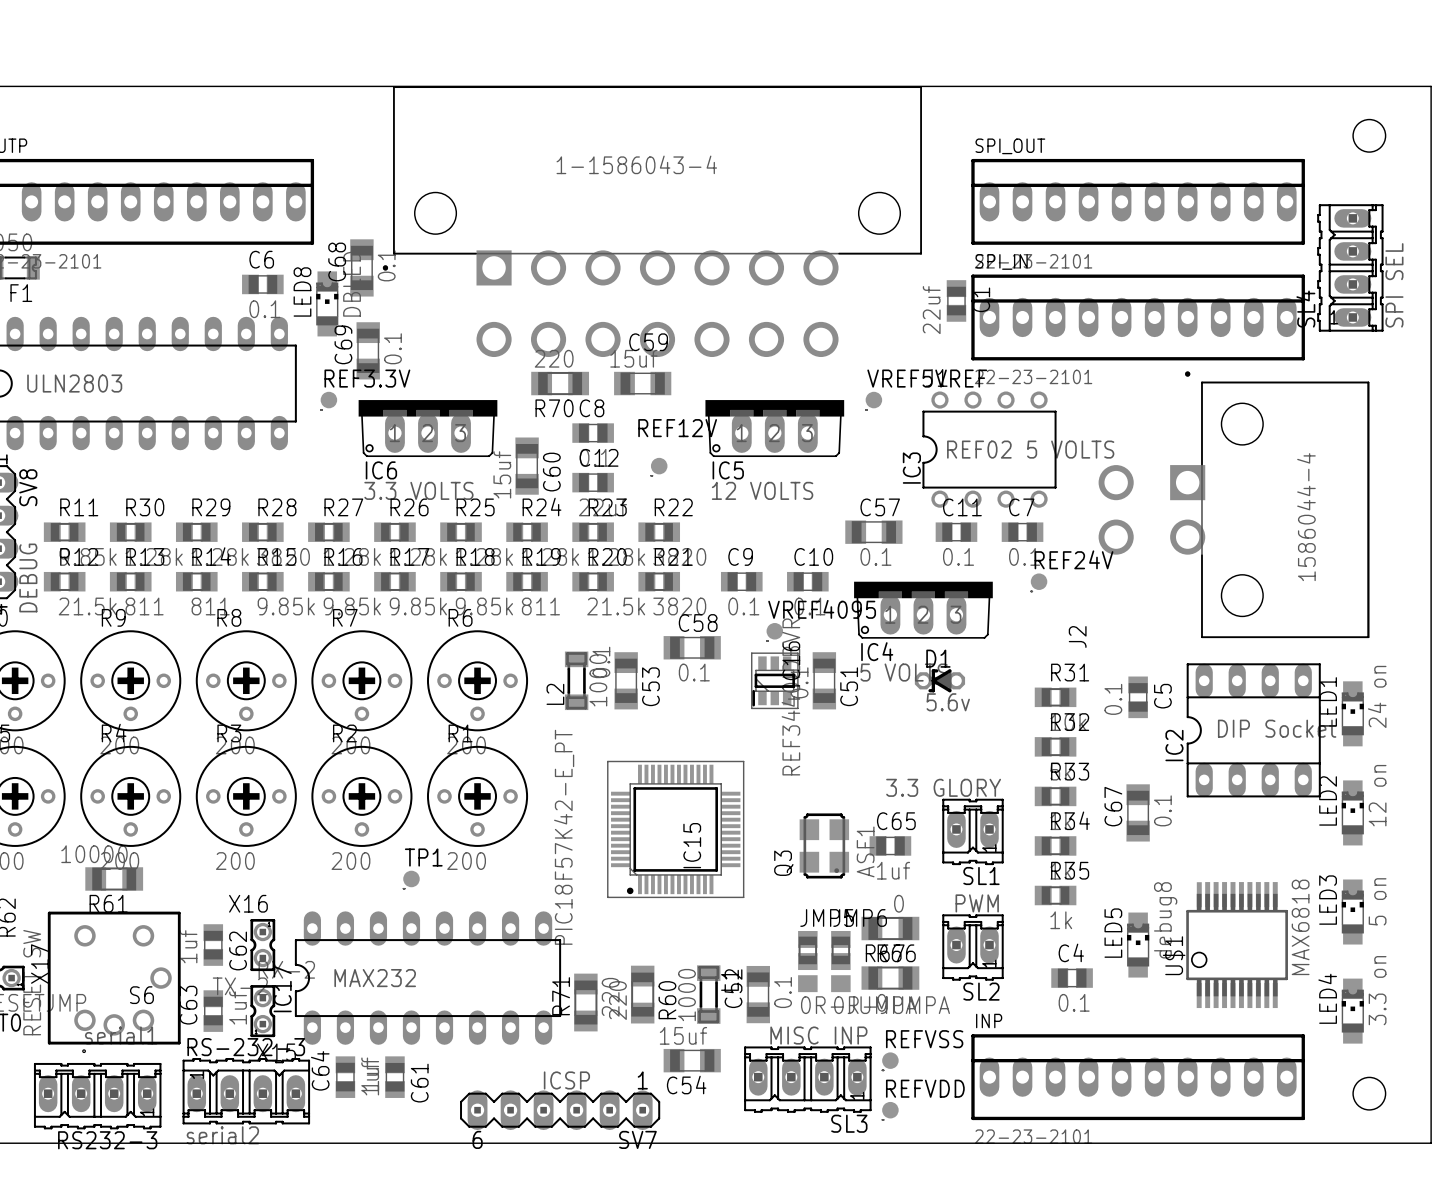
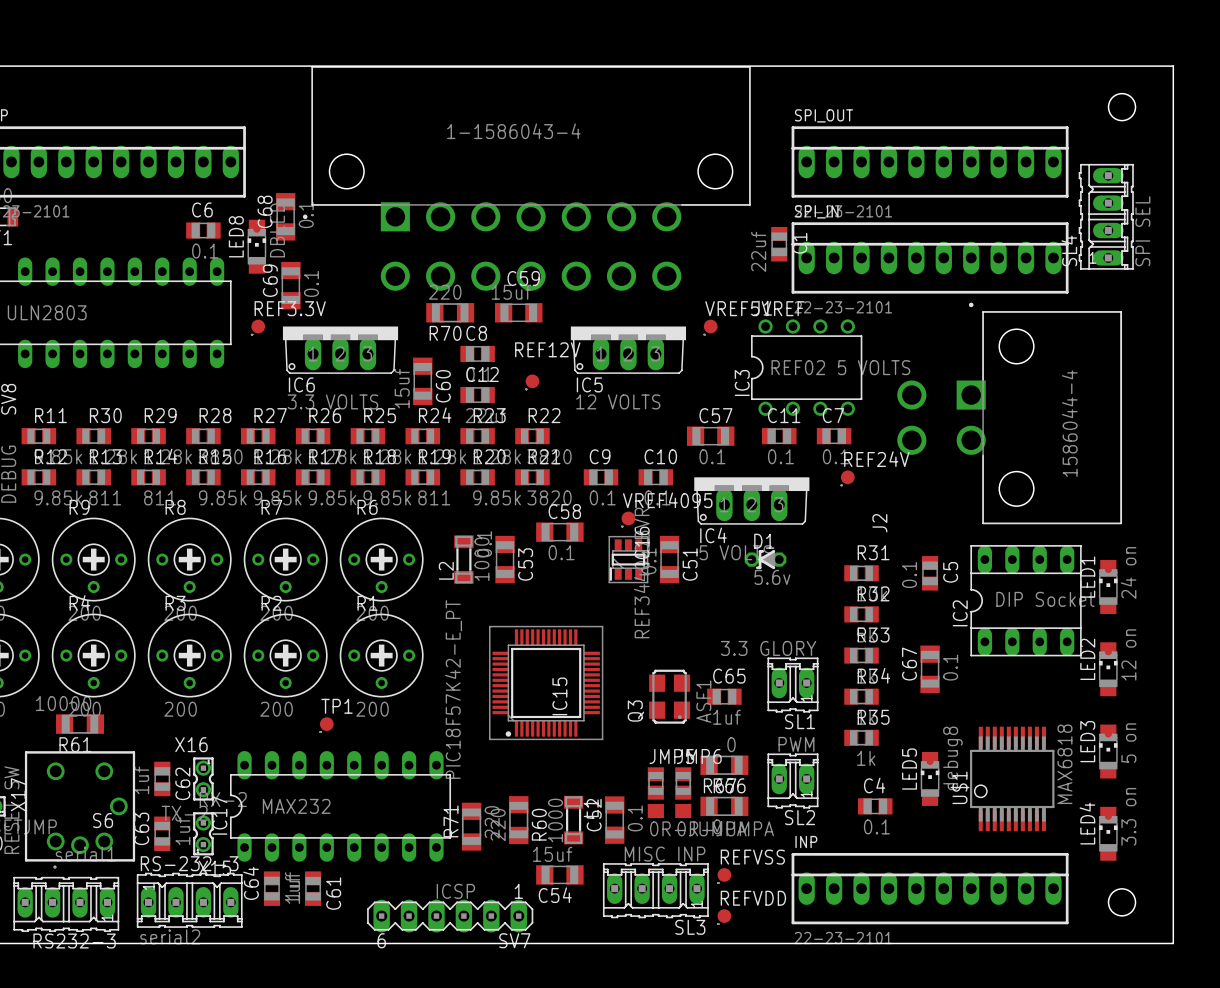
R12 value: 21.5k (87, 606) -> 9.85k (58, 497)
R20 value: 21.5k (616, 606) -> 9.85k (497, 497)

